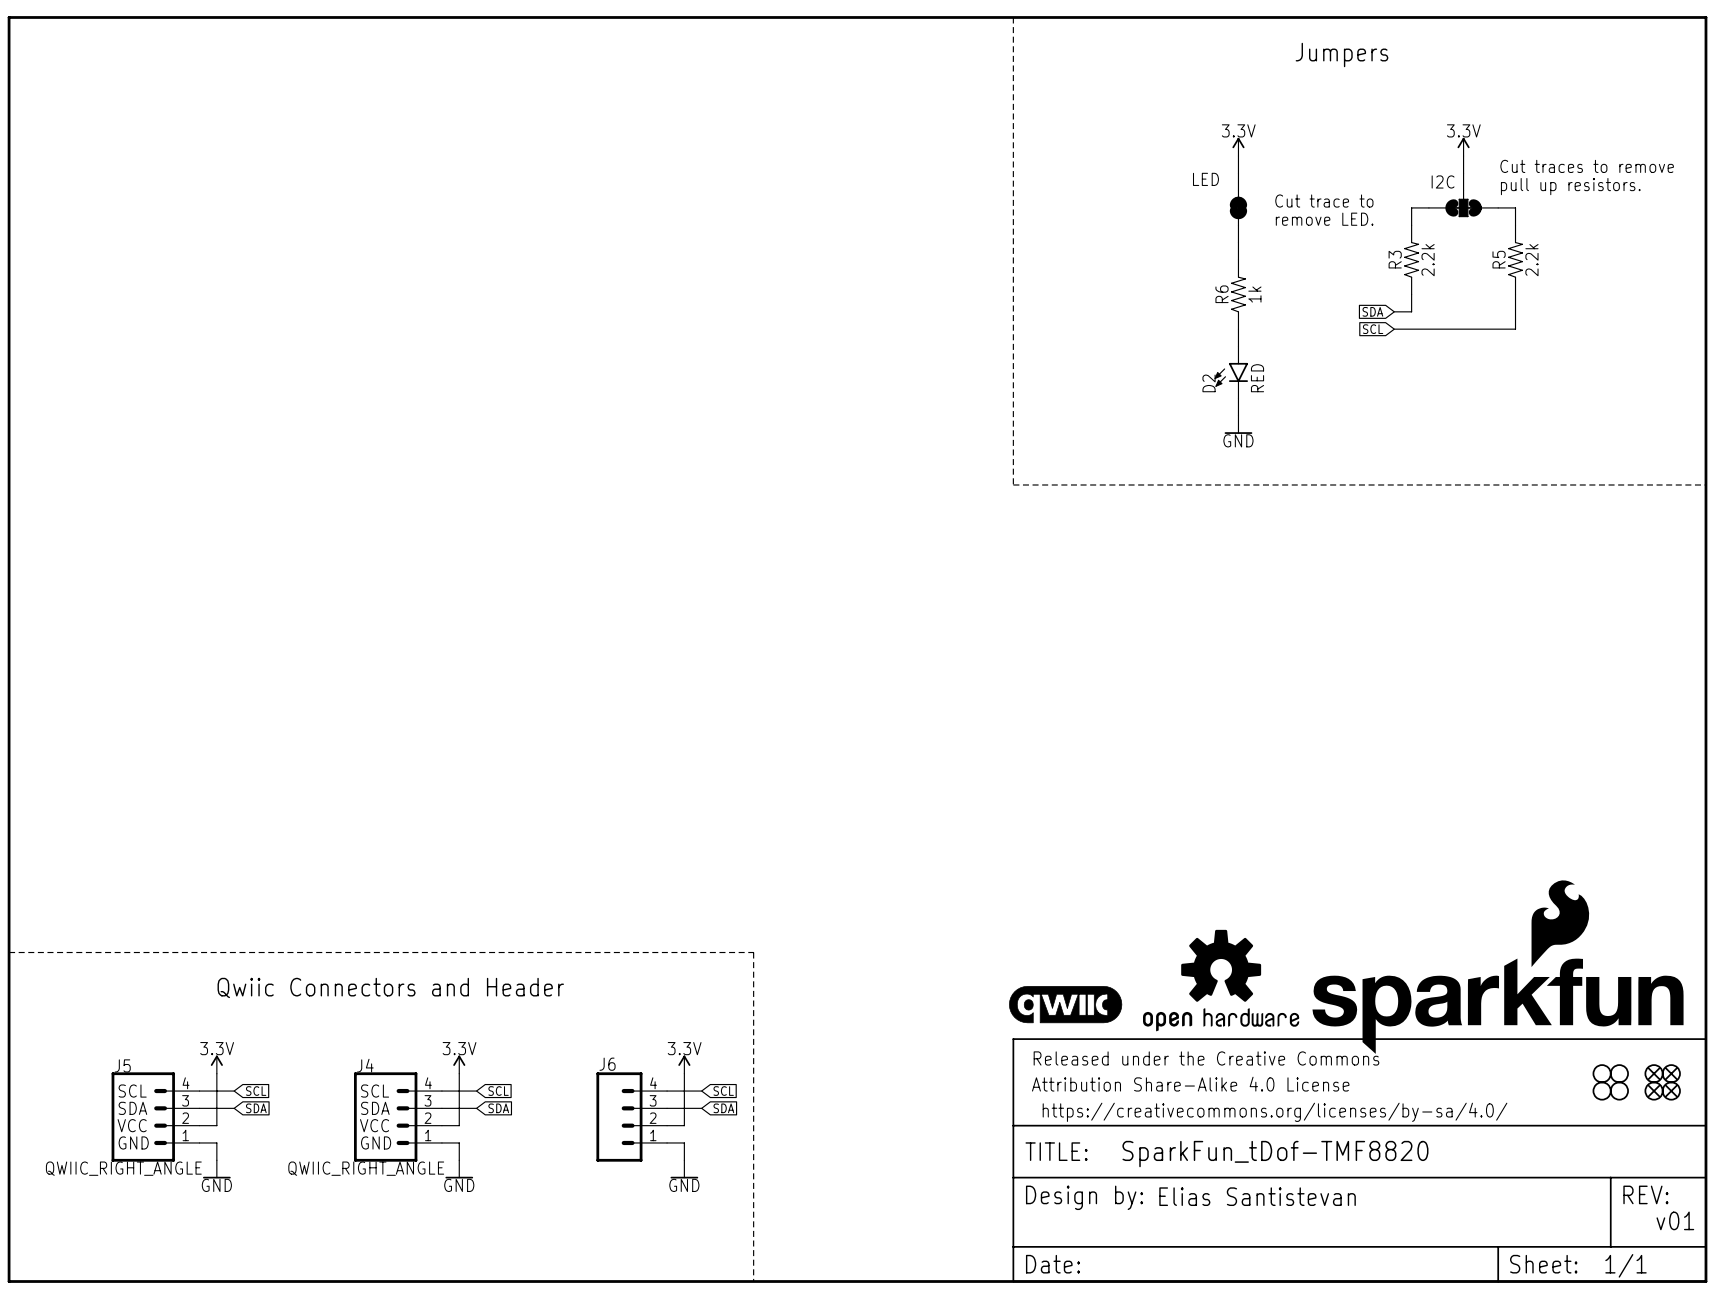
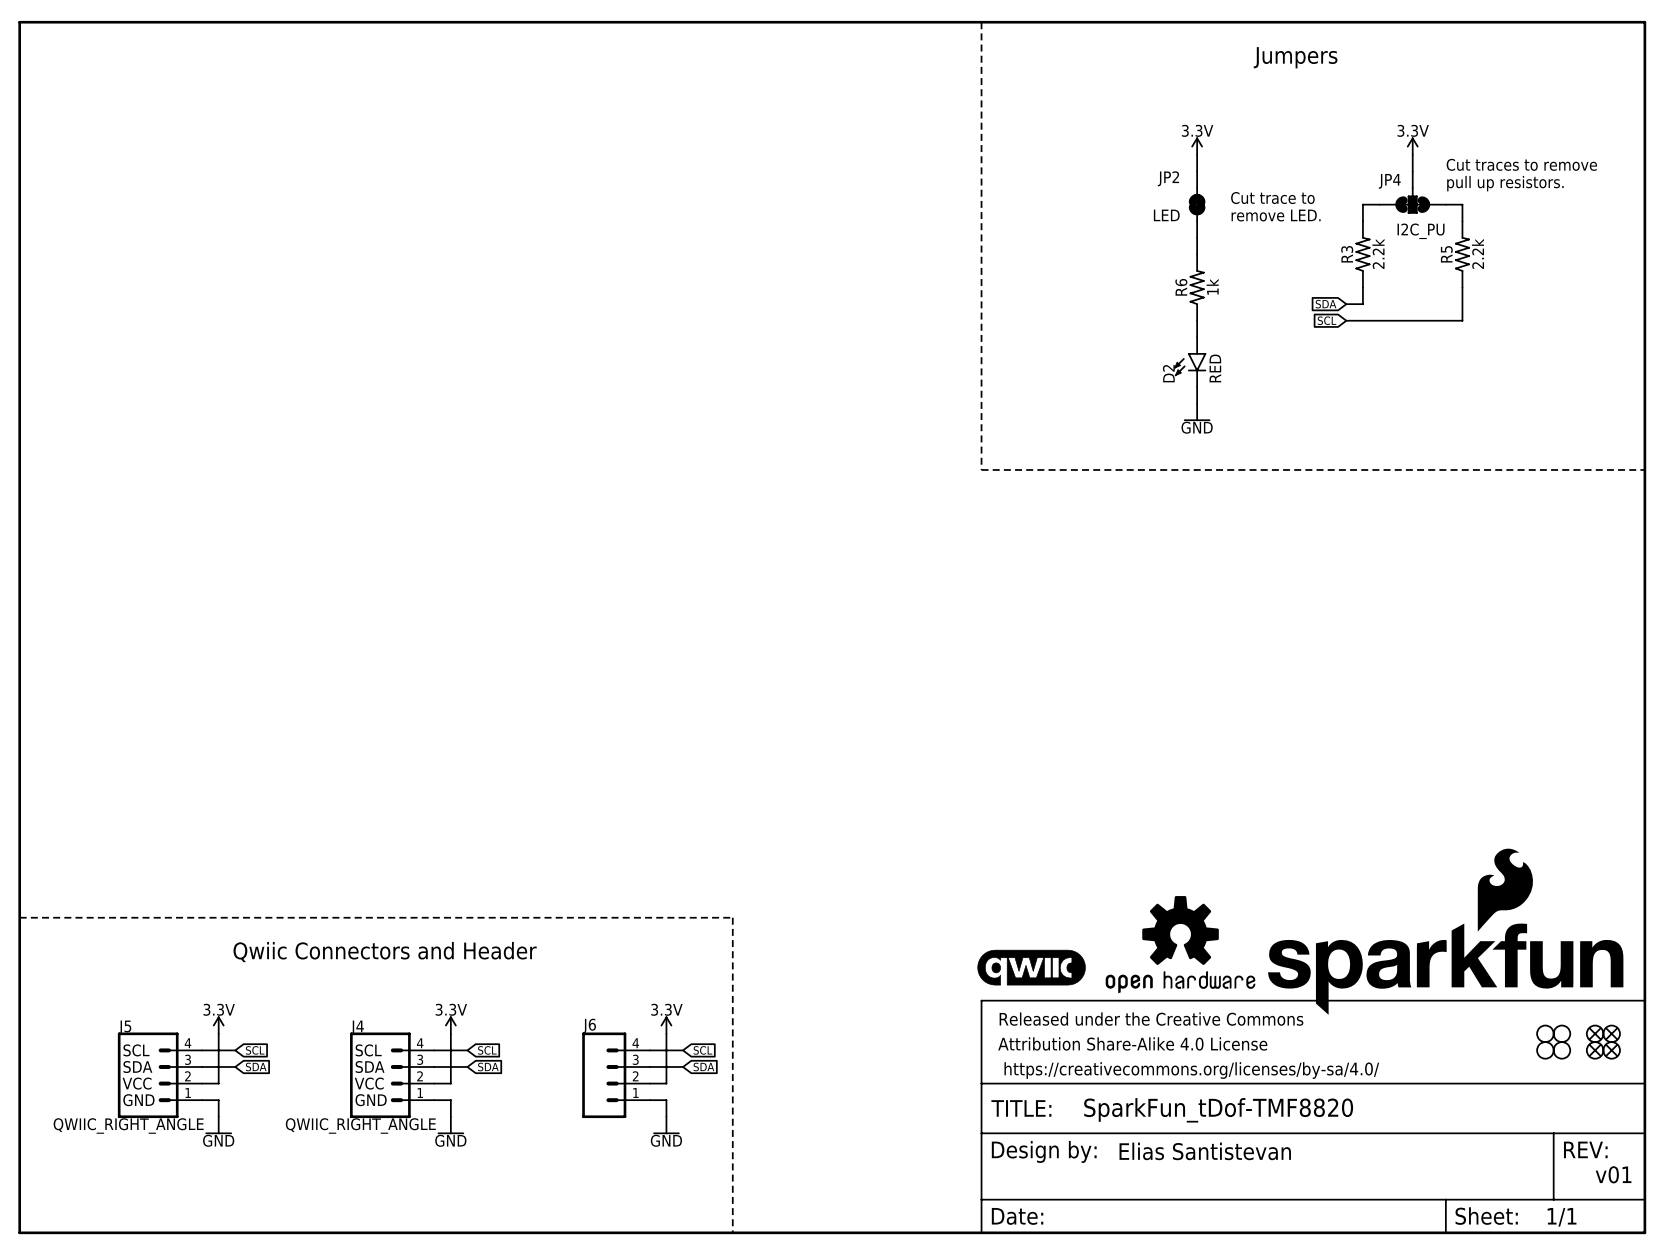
LED name: LED (1205, 179) -> JP2 (1168, 178)
I2C name: I2C (1443, 181) -> JP4 (1389, 181)
LED value: none -> LED (1166, 215)
I2C value: none -> I2C_PU (1421, 231)

